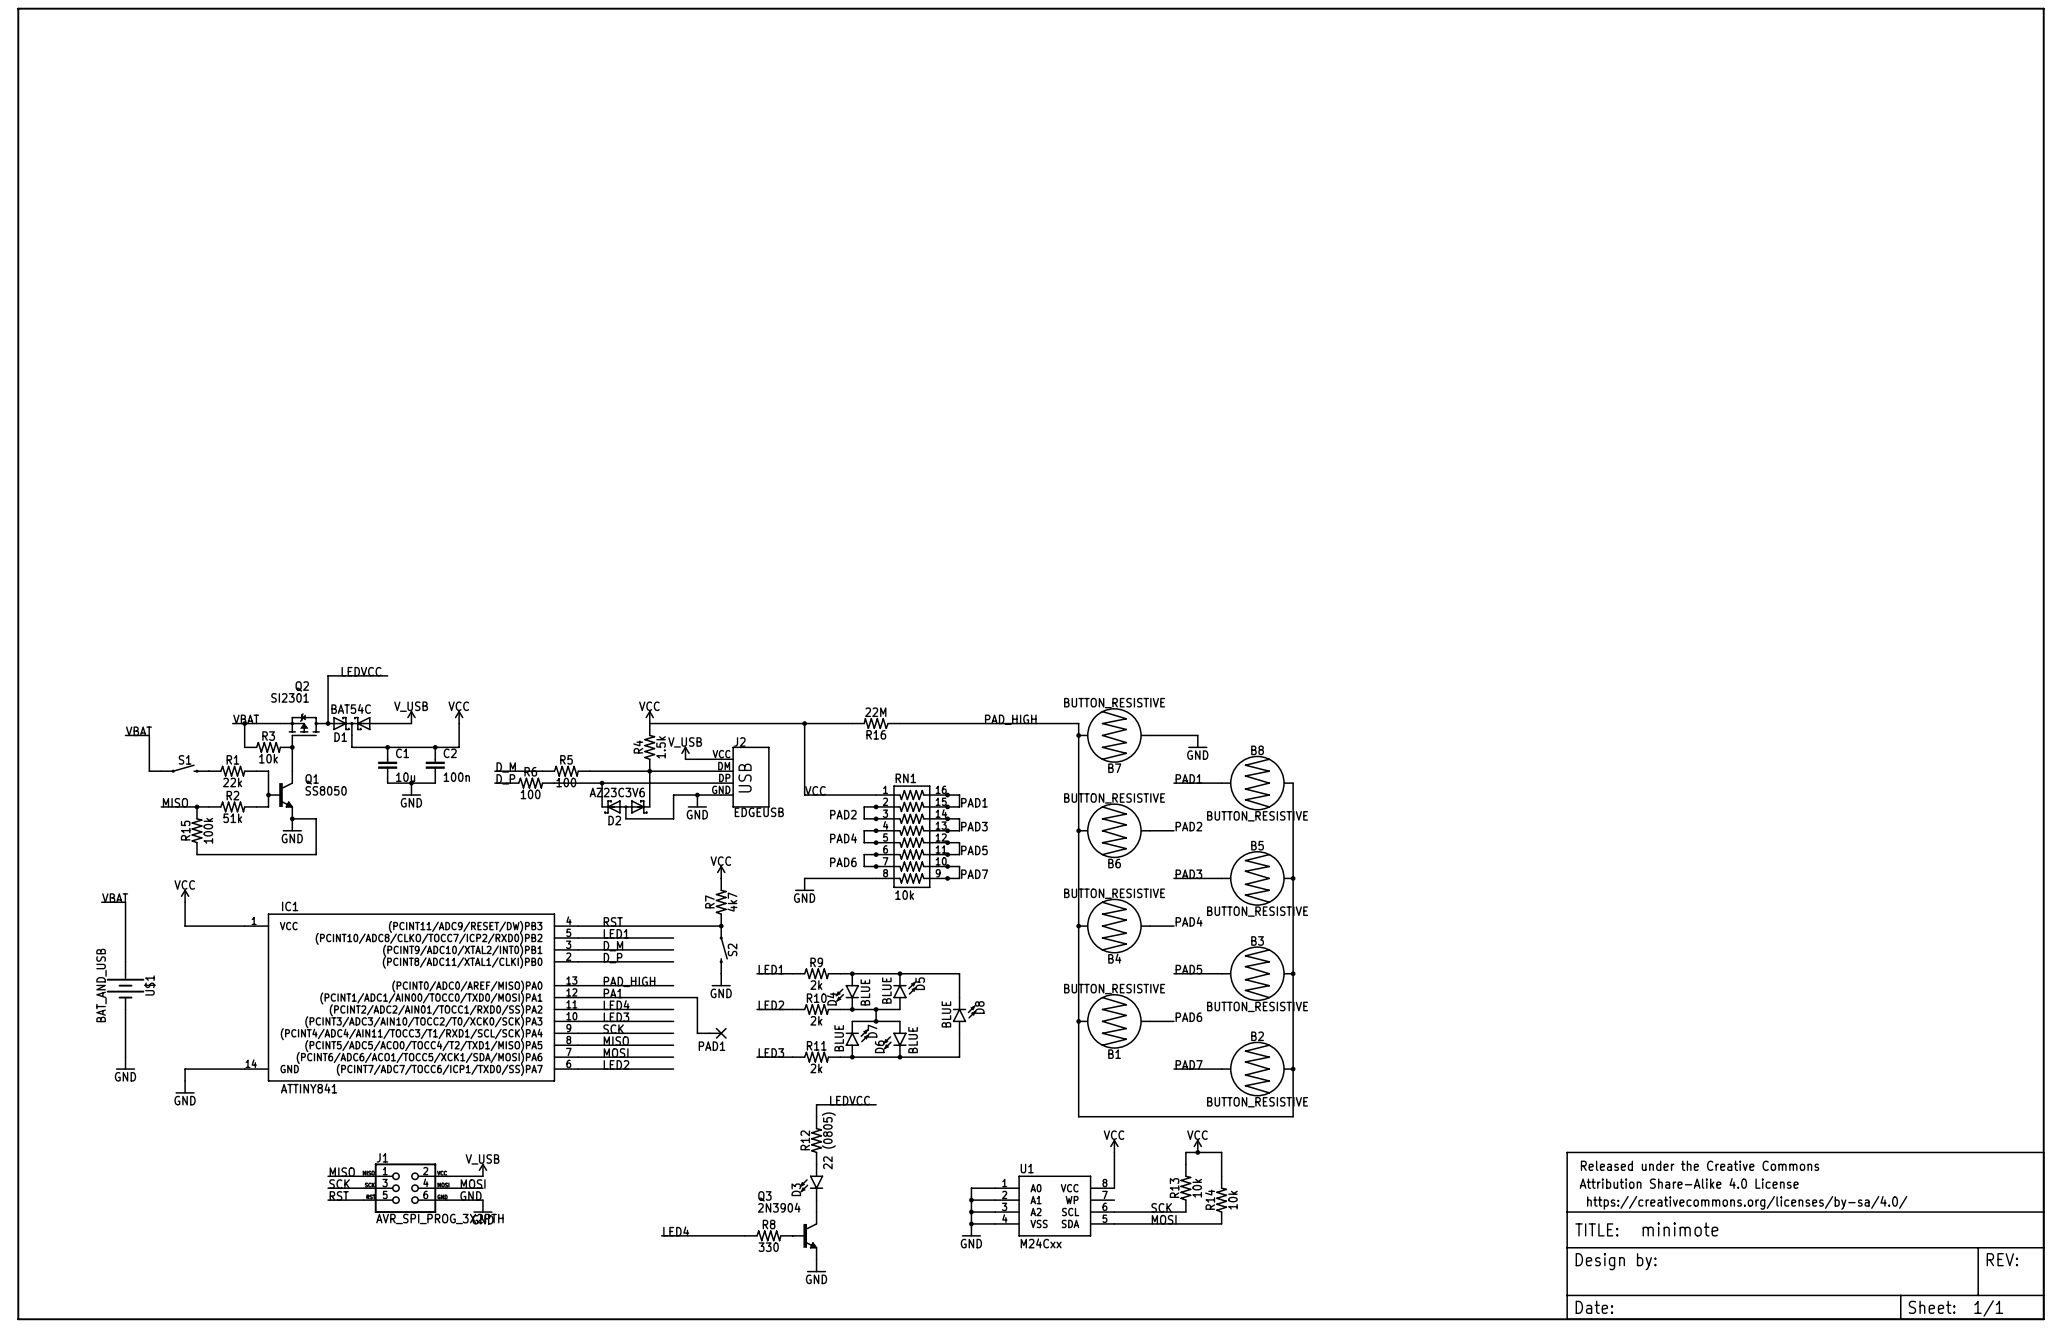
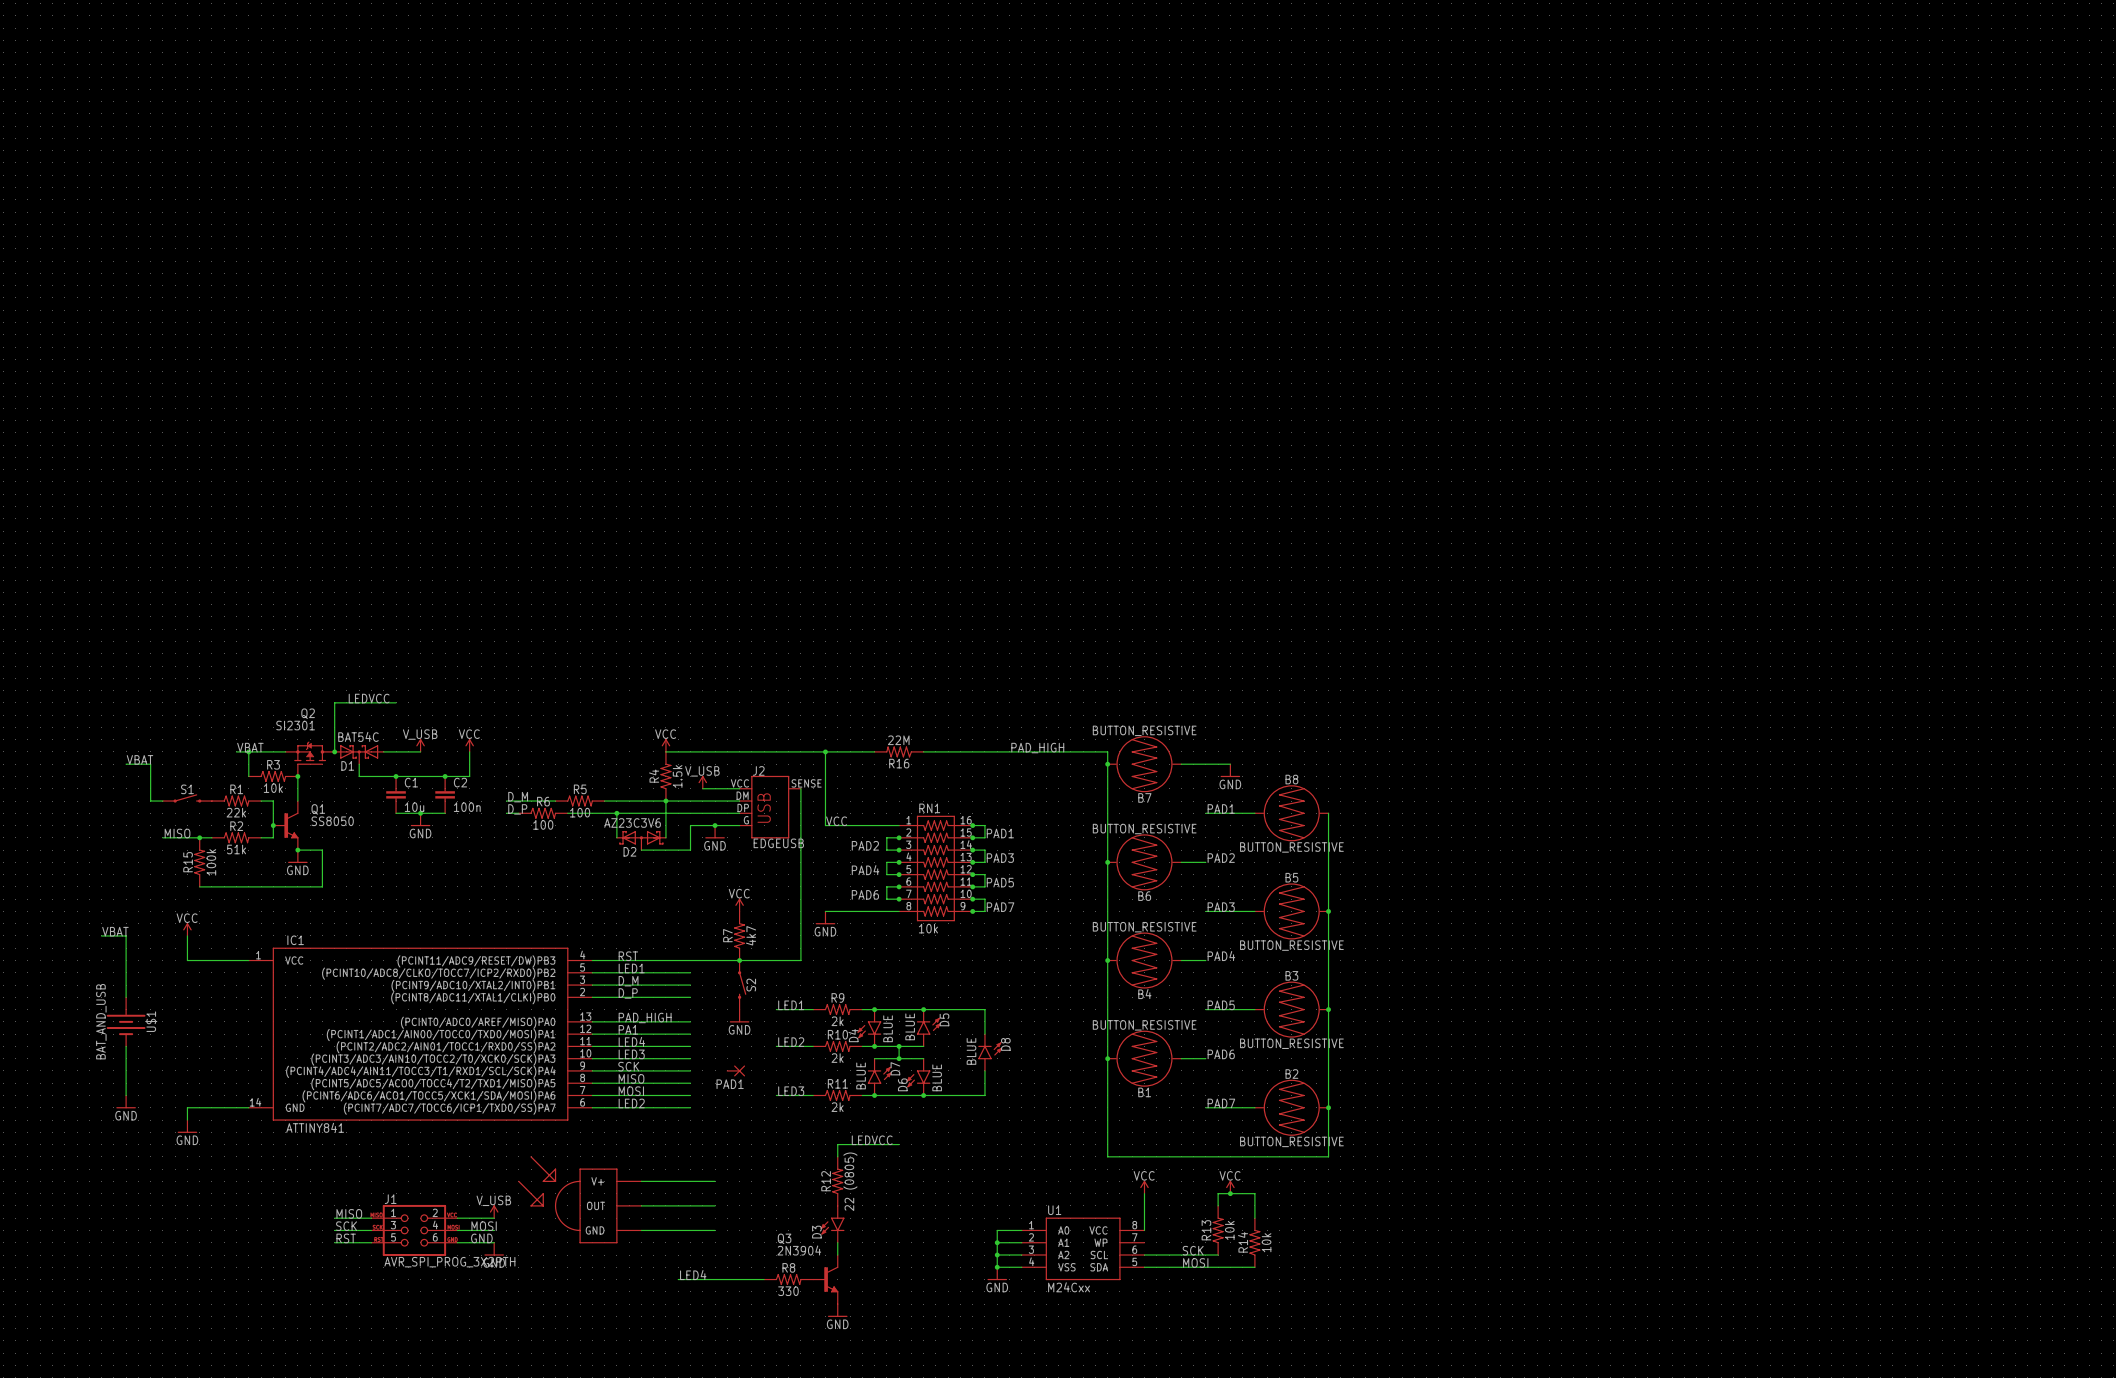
part: (1031, 663) -> none
J2 symbol: [721, 746, 770, 808] -> [739, 775, 801, 839]
wire: none -> (800, 788) (800, 960) (739, 960)
wire: (673, 997) (697, 997) (697, 1033) (709, 1033) -> none
wire: none -> (641, 1181) (715, 1181)
part: none -> (579, 1199)
wire: none -> (641, 1205) (715, 1205)
wire: none -> (641, 1230) (715, 1230)
part: (1805, 1235) -> none

